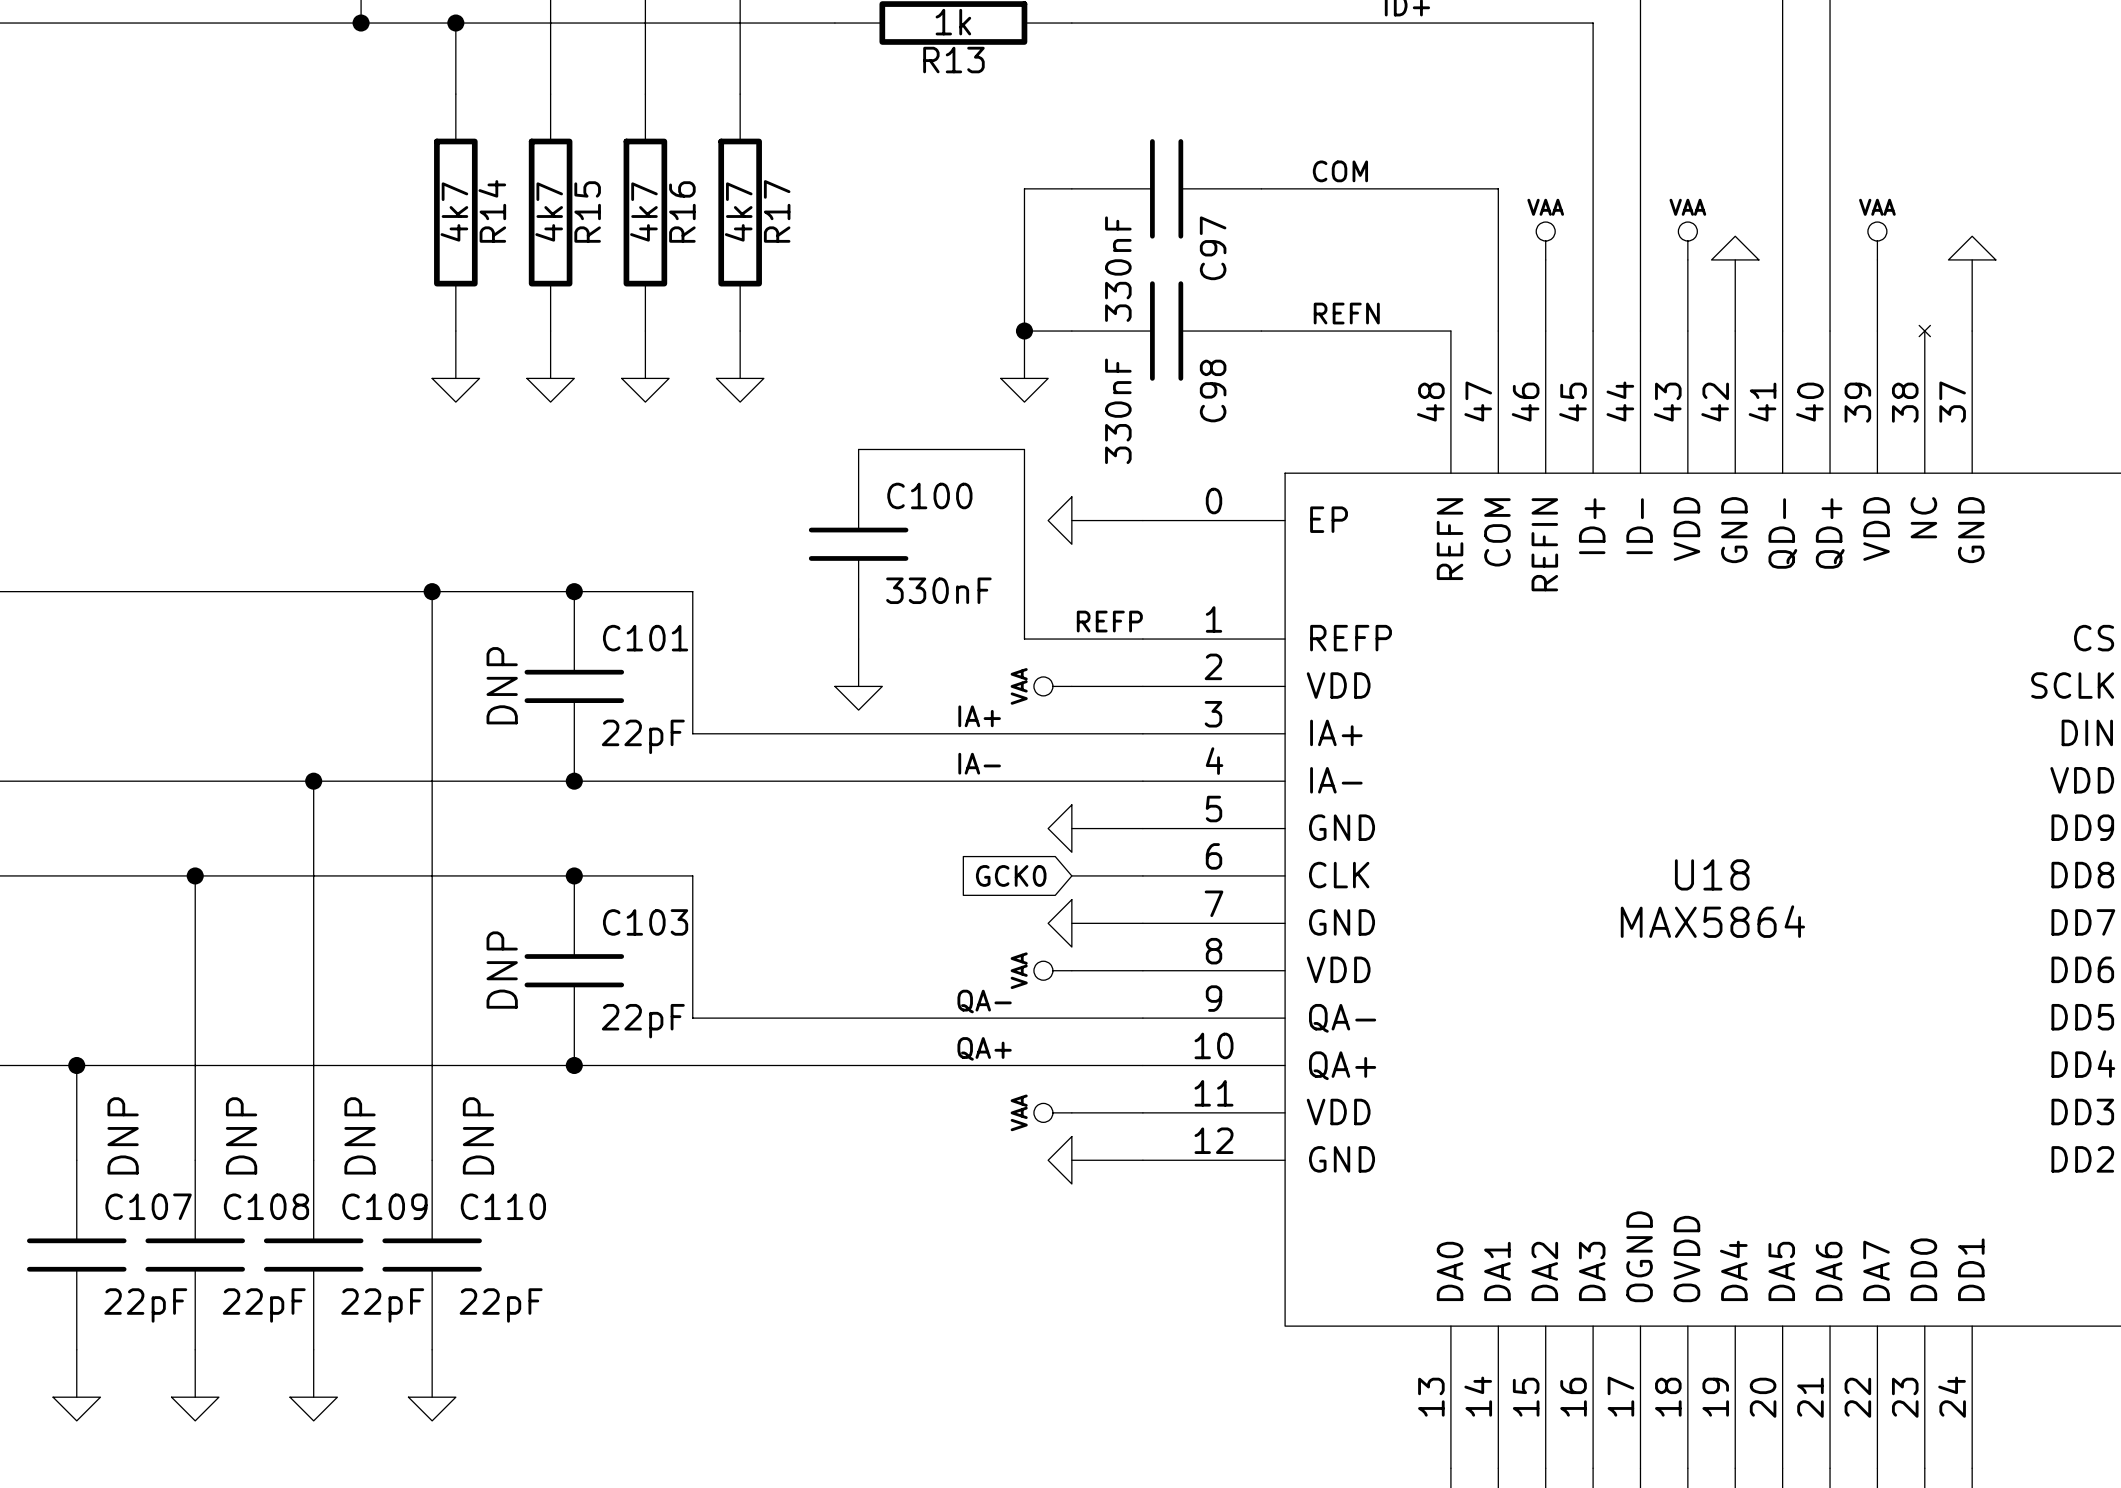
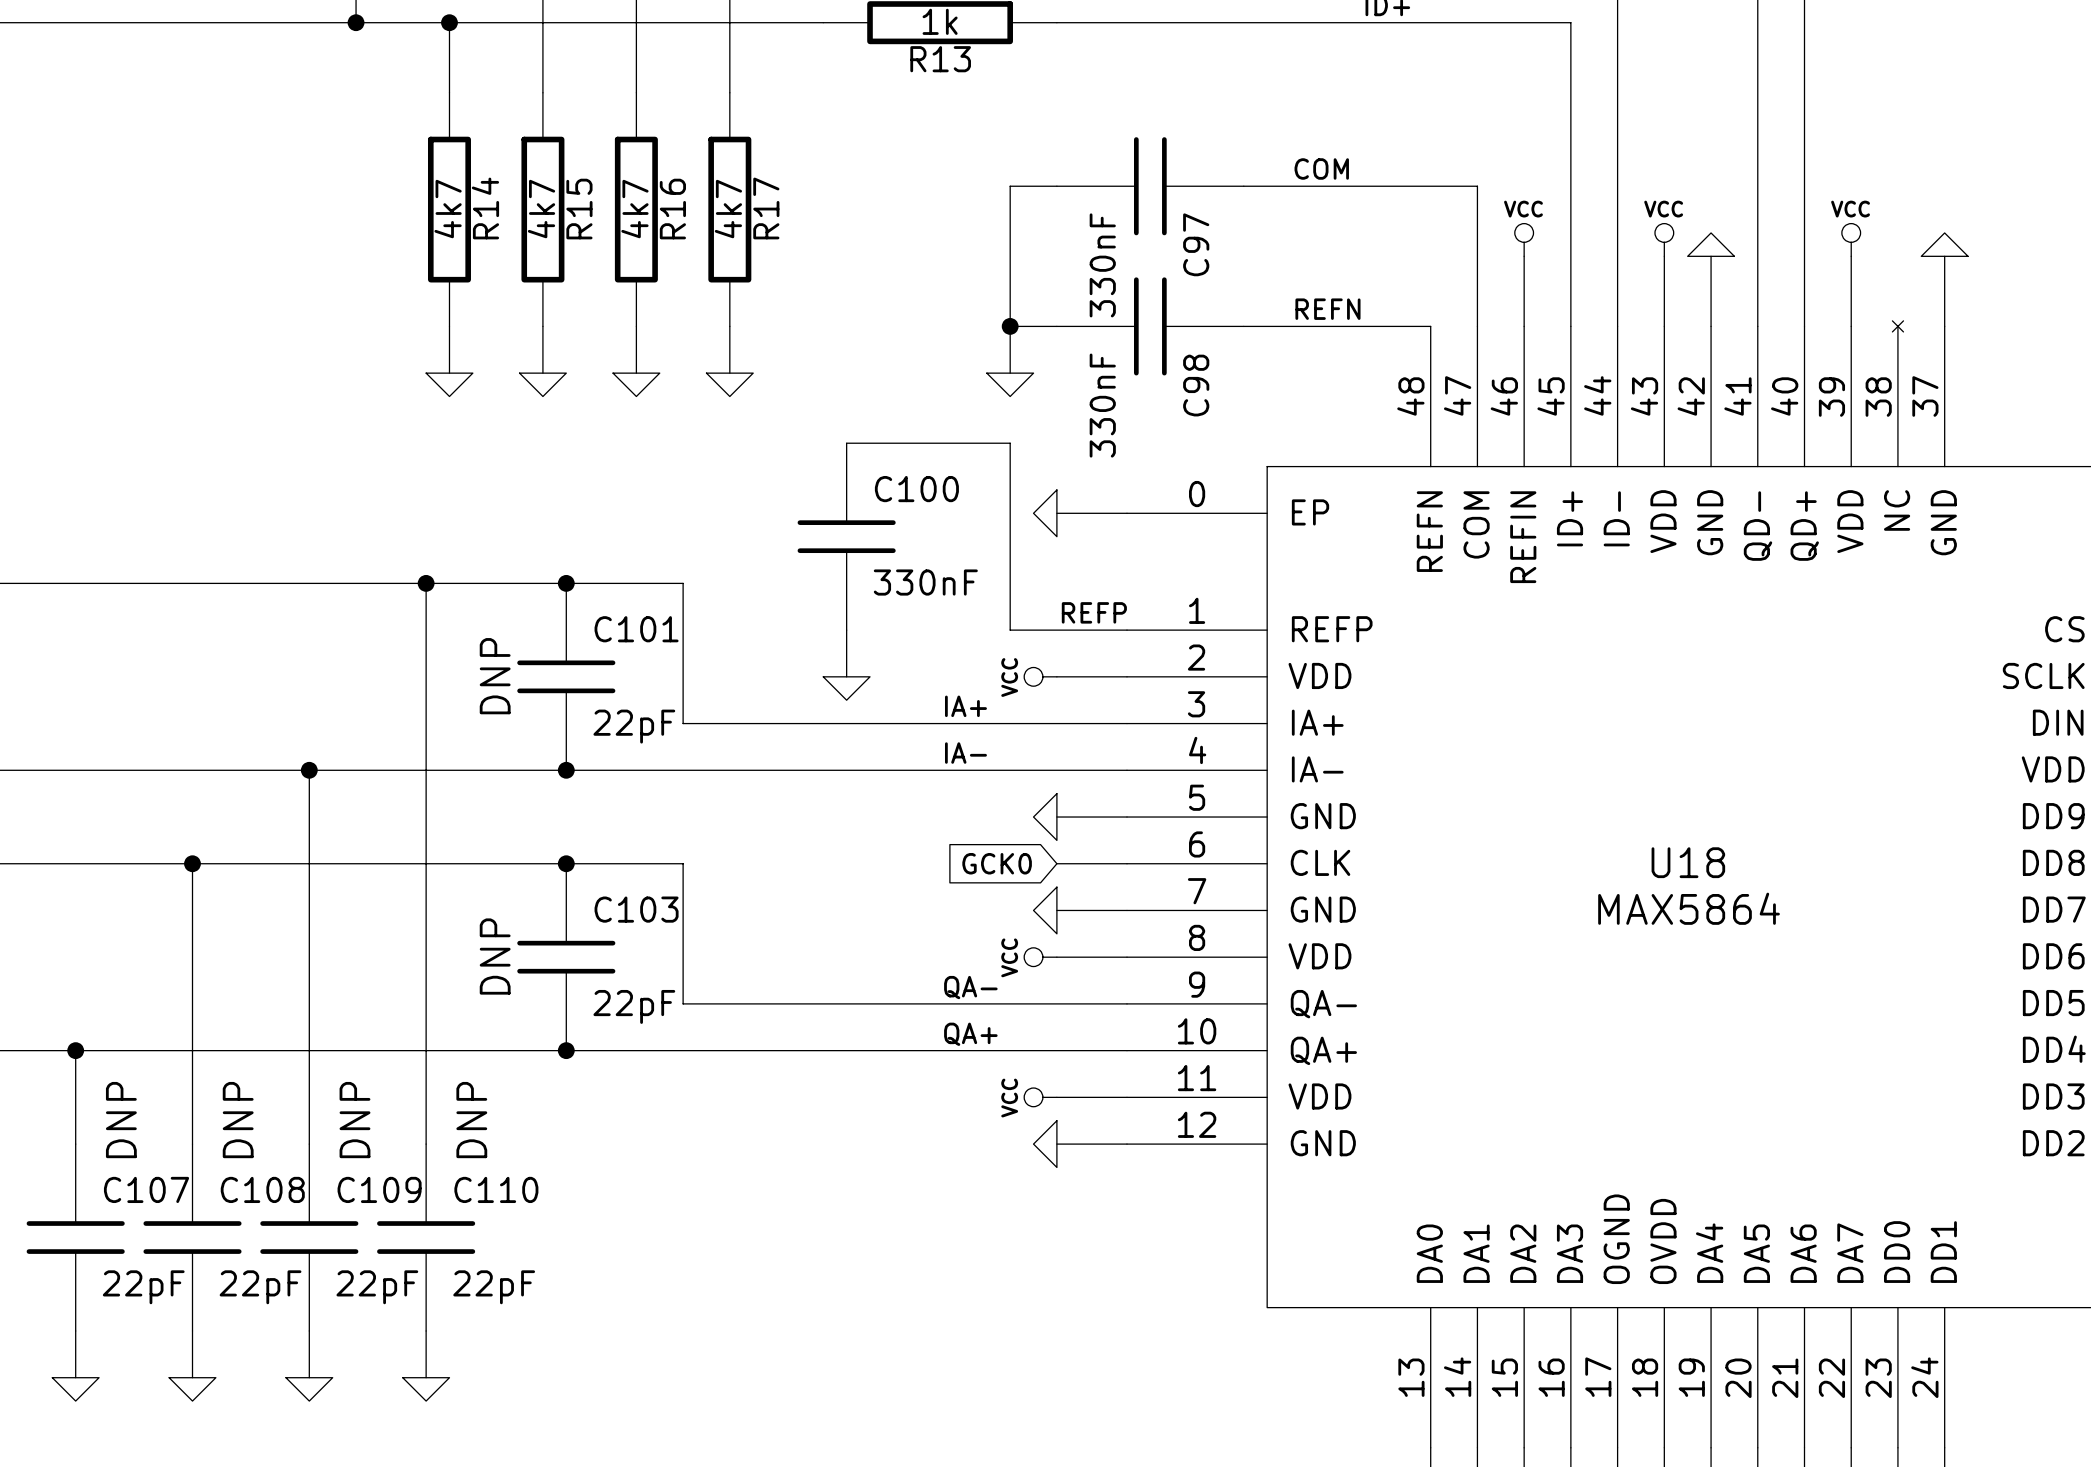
power symbol: VAA (1545, 240) -> VCC (1524, 239)
power symbol: VAA (1687, 240) -> VCC (1664, 239)
power symbol: VAA (1877, 240) -> VCC (1851, 239)
power symbol: VAA (1052, 686) -> VCC (1040, 676)
power symbol: VAA (1052, 970) -> VCC (1040, 957)
power symbol: VAA (1052, 1112) -> VCC (1040, 1097)

